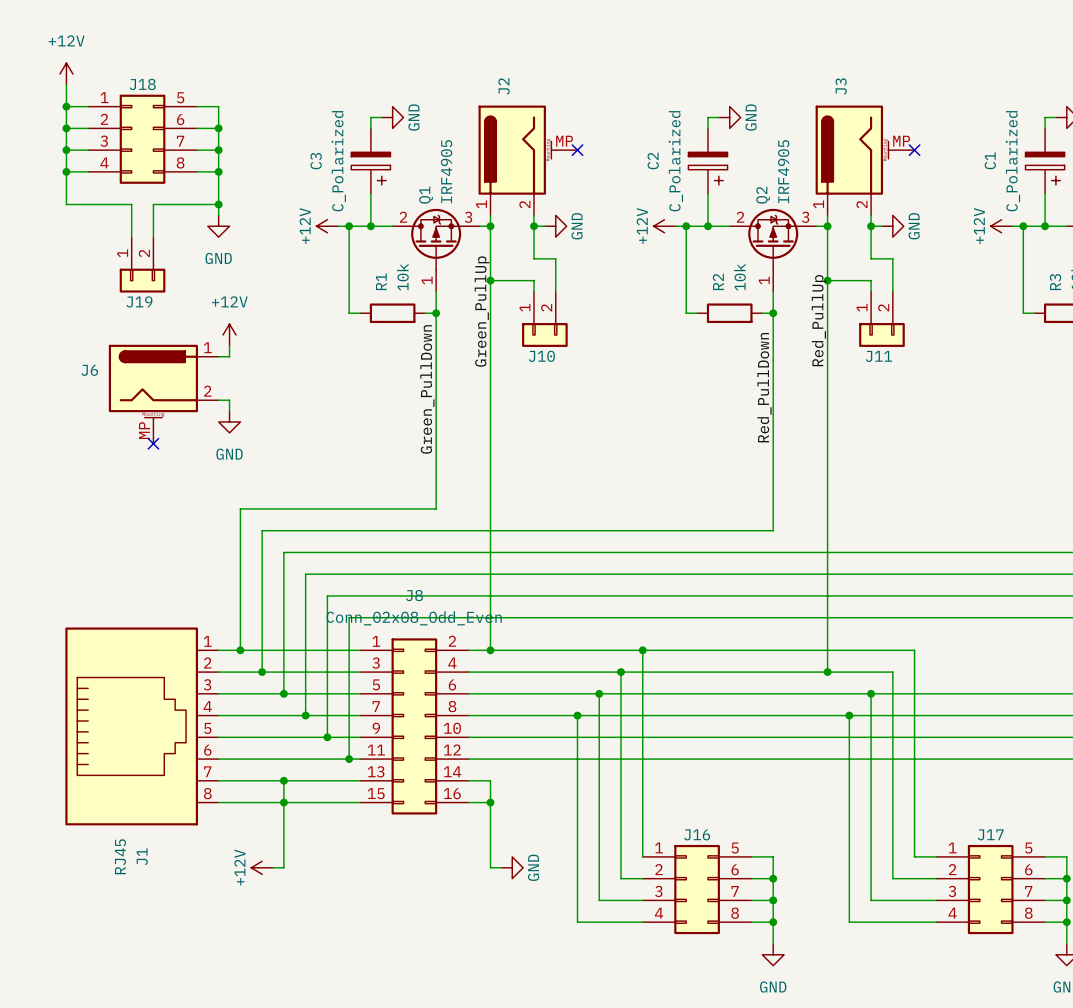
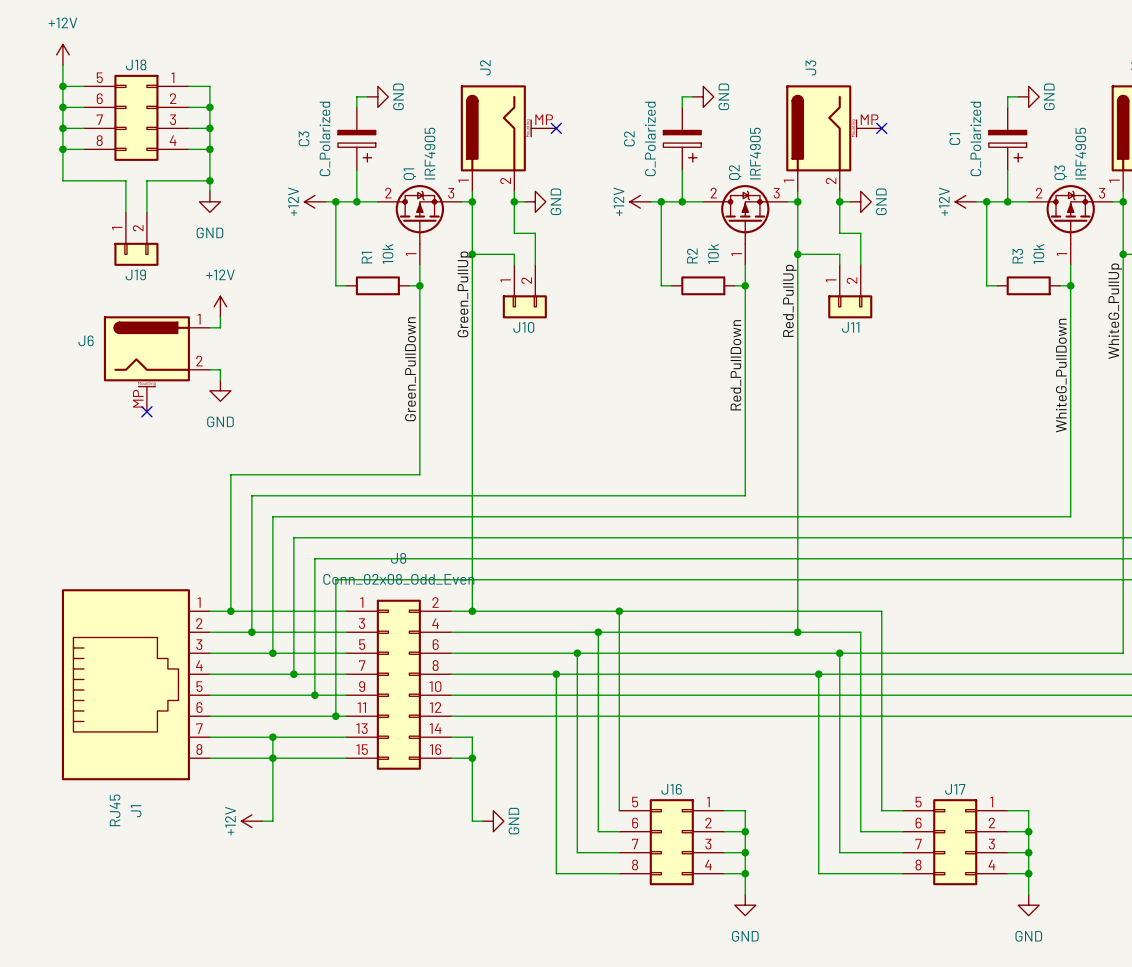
J18 flip: as is (142, 139) -> left-right (136, 117)
J16 flip: as is (697, 889) -> left-right (671, 842)
J17 flip: as is (990, 889) -> left-right (955, 842)

